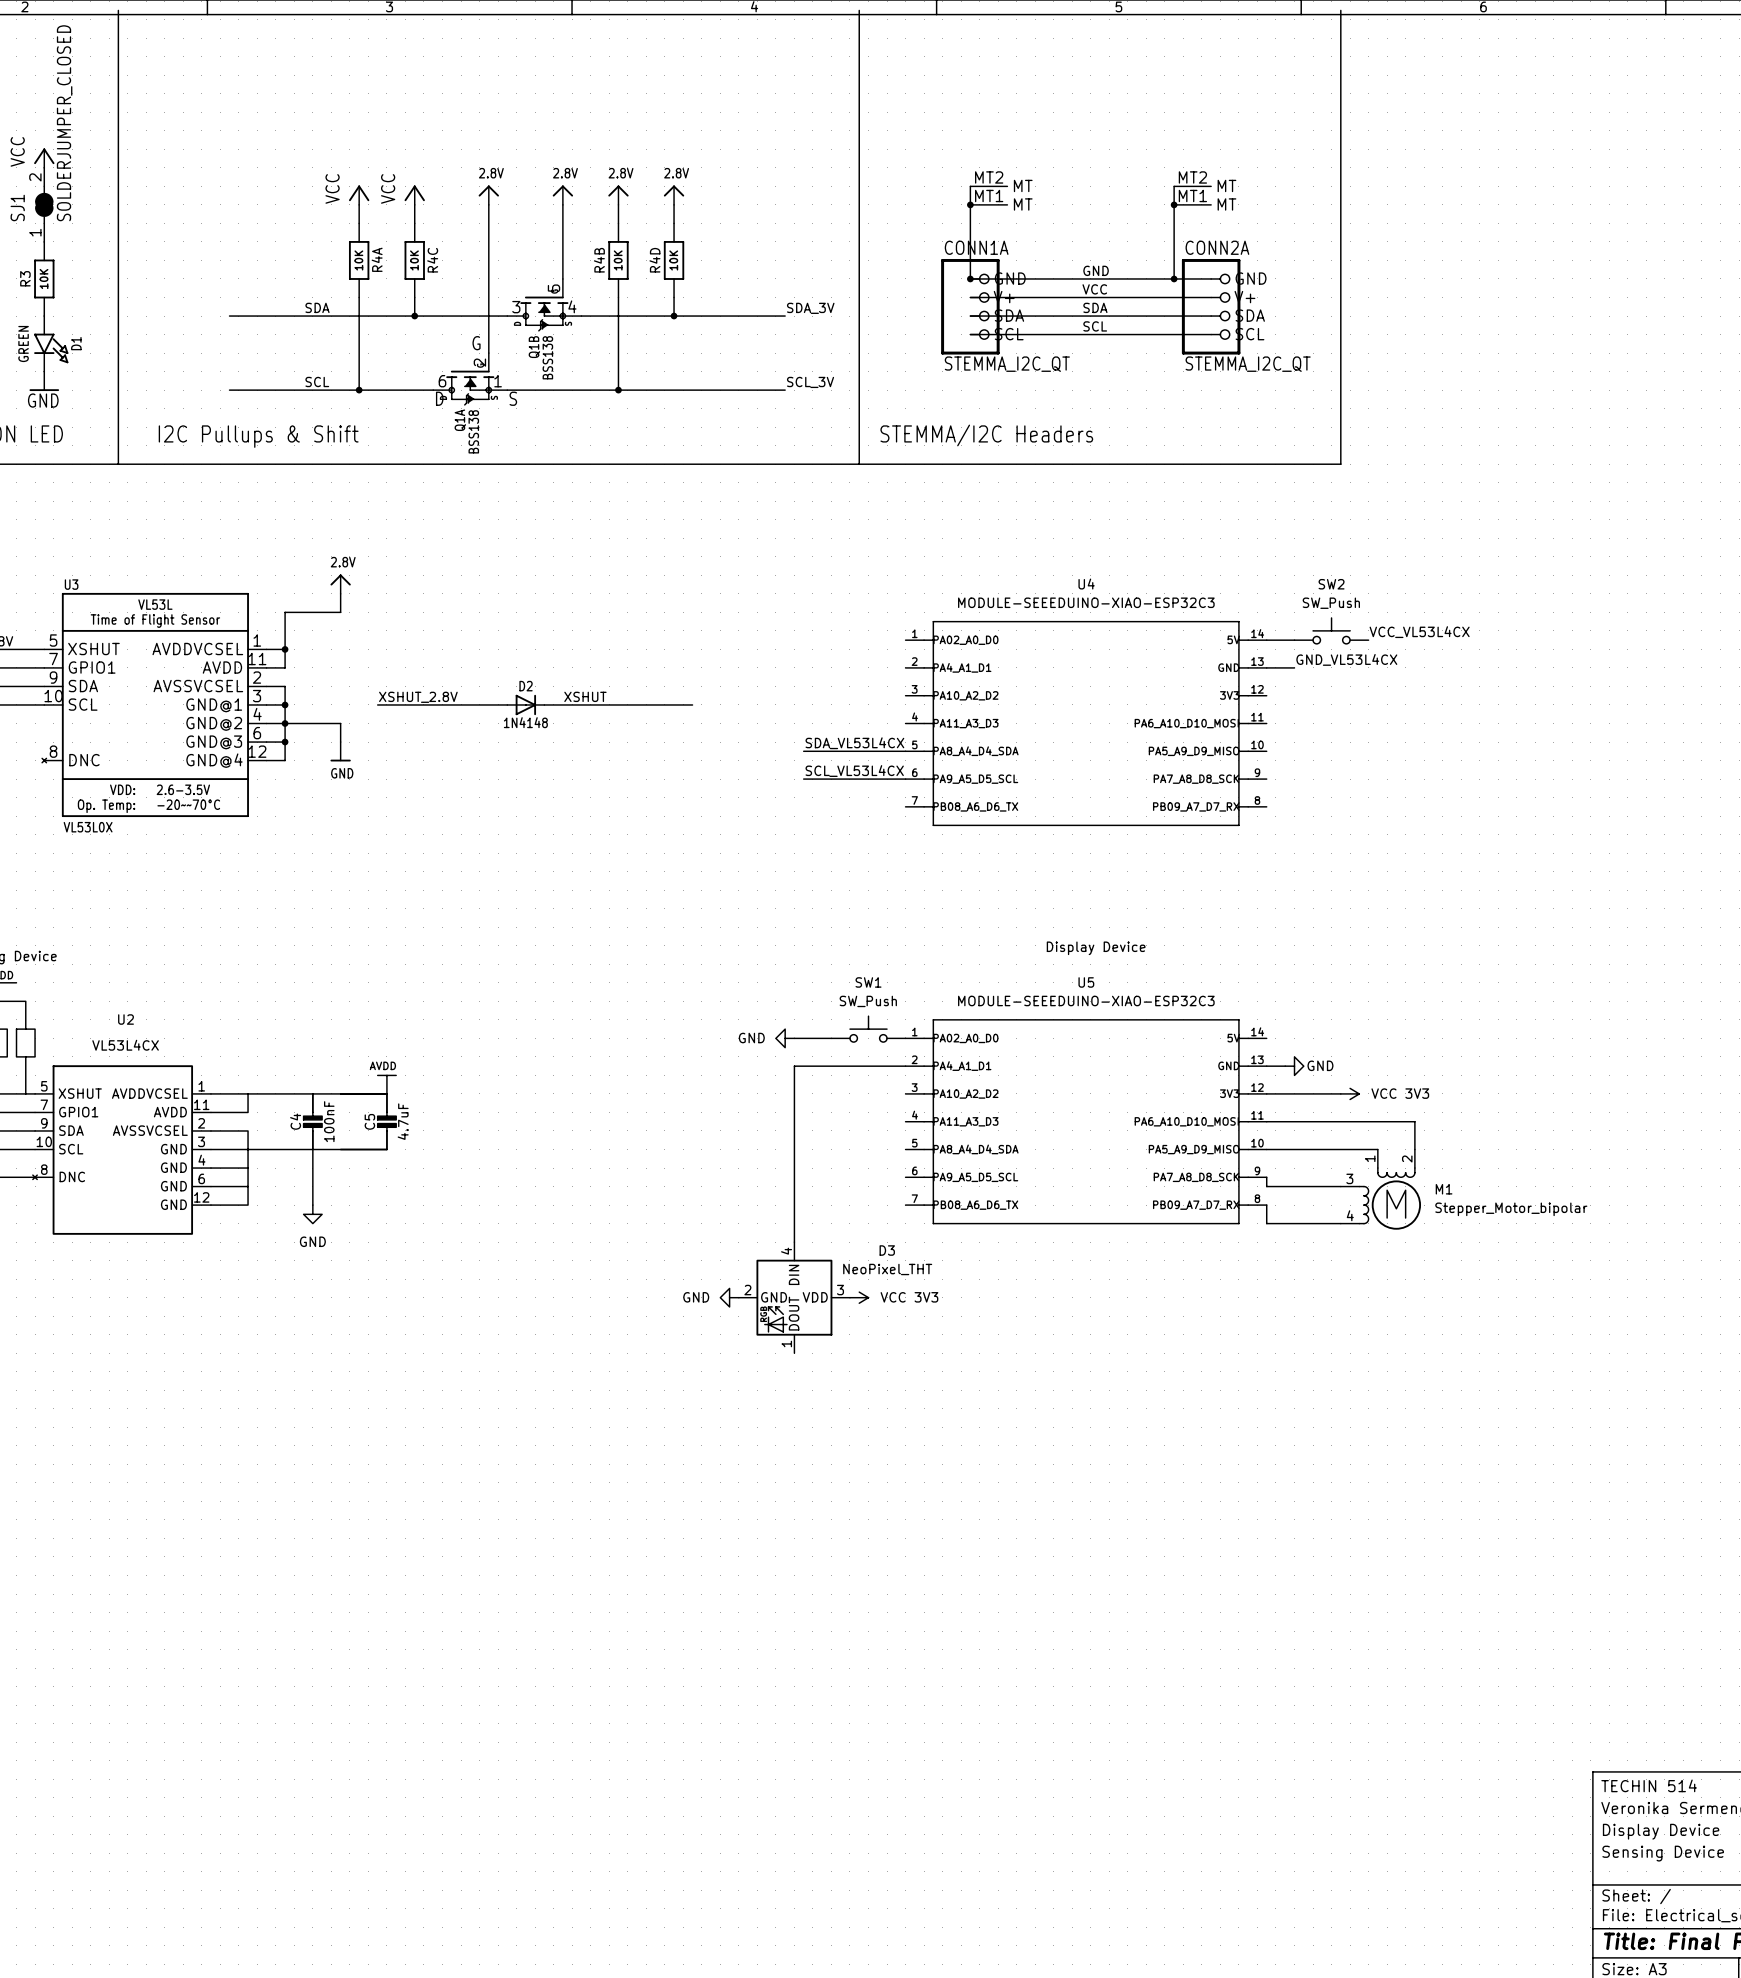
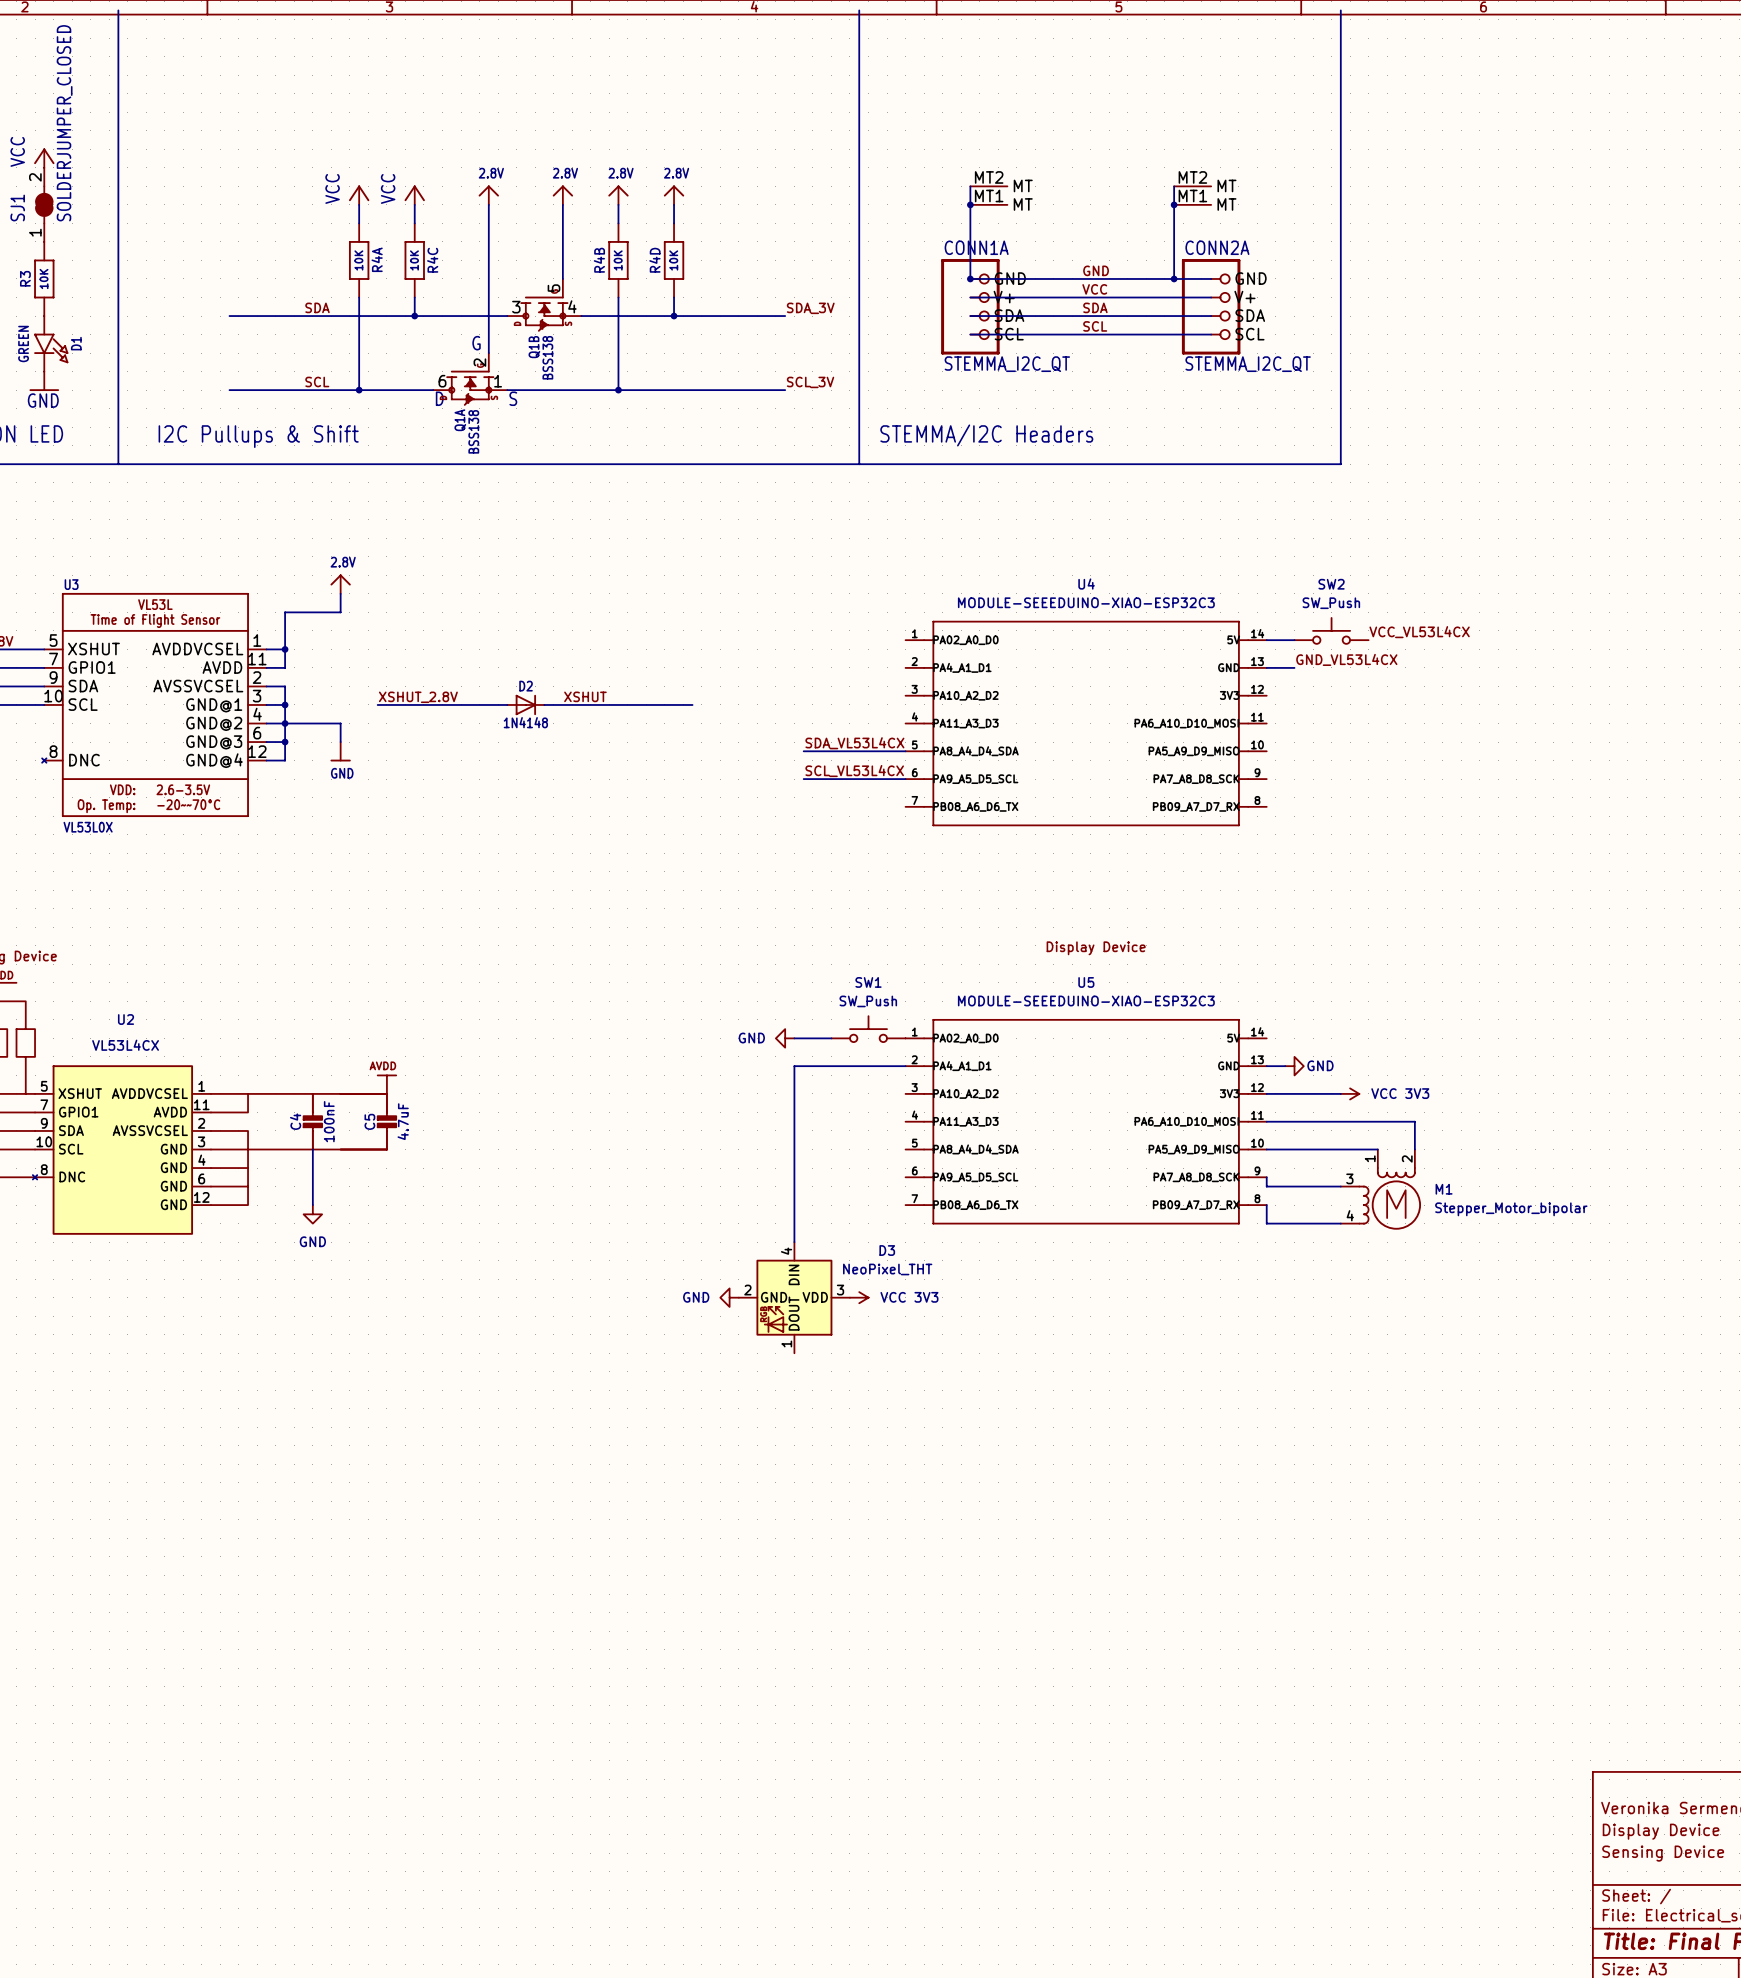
title block: TECHIN 514 (1649, 1785) -> none

